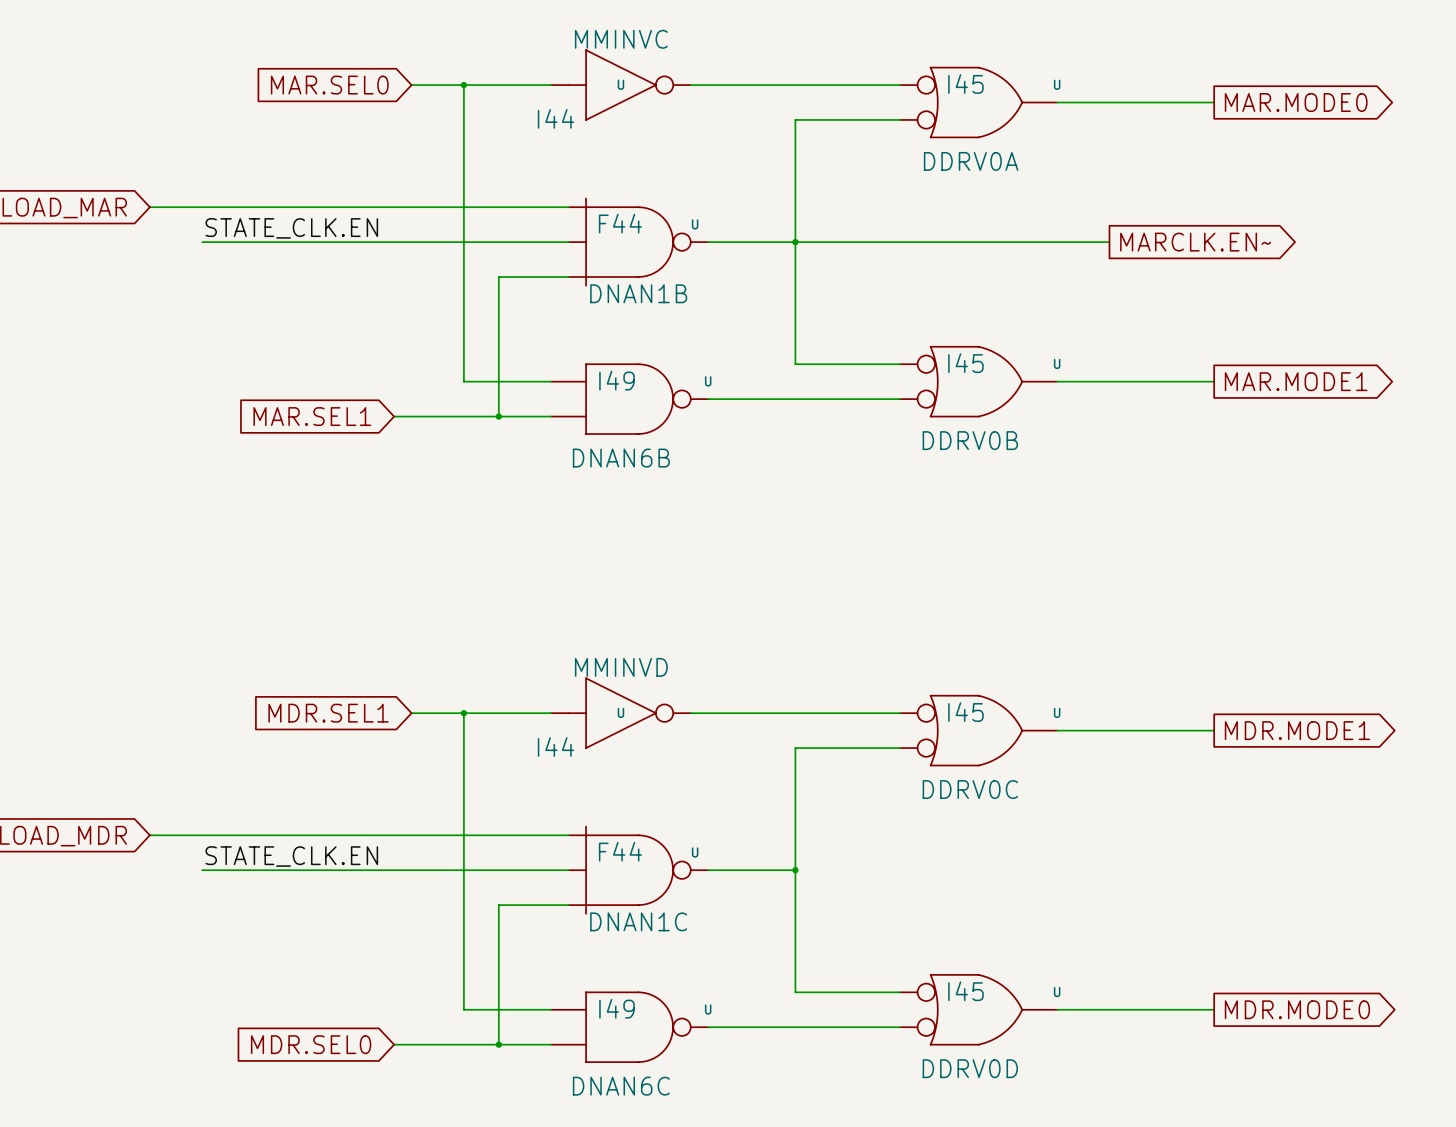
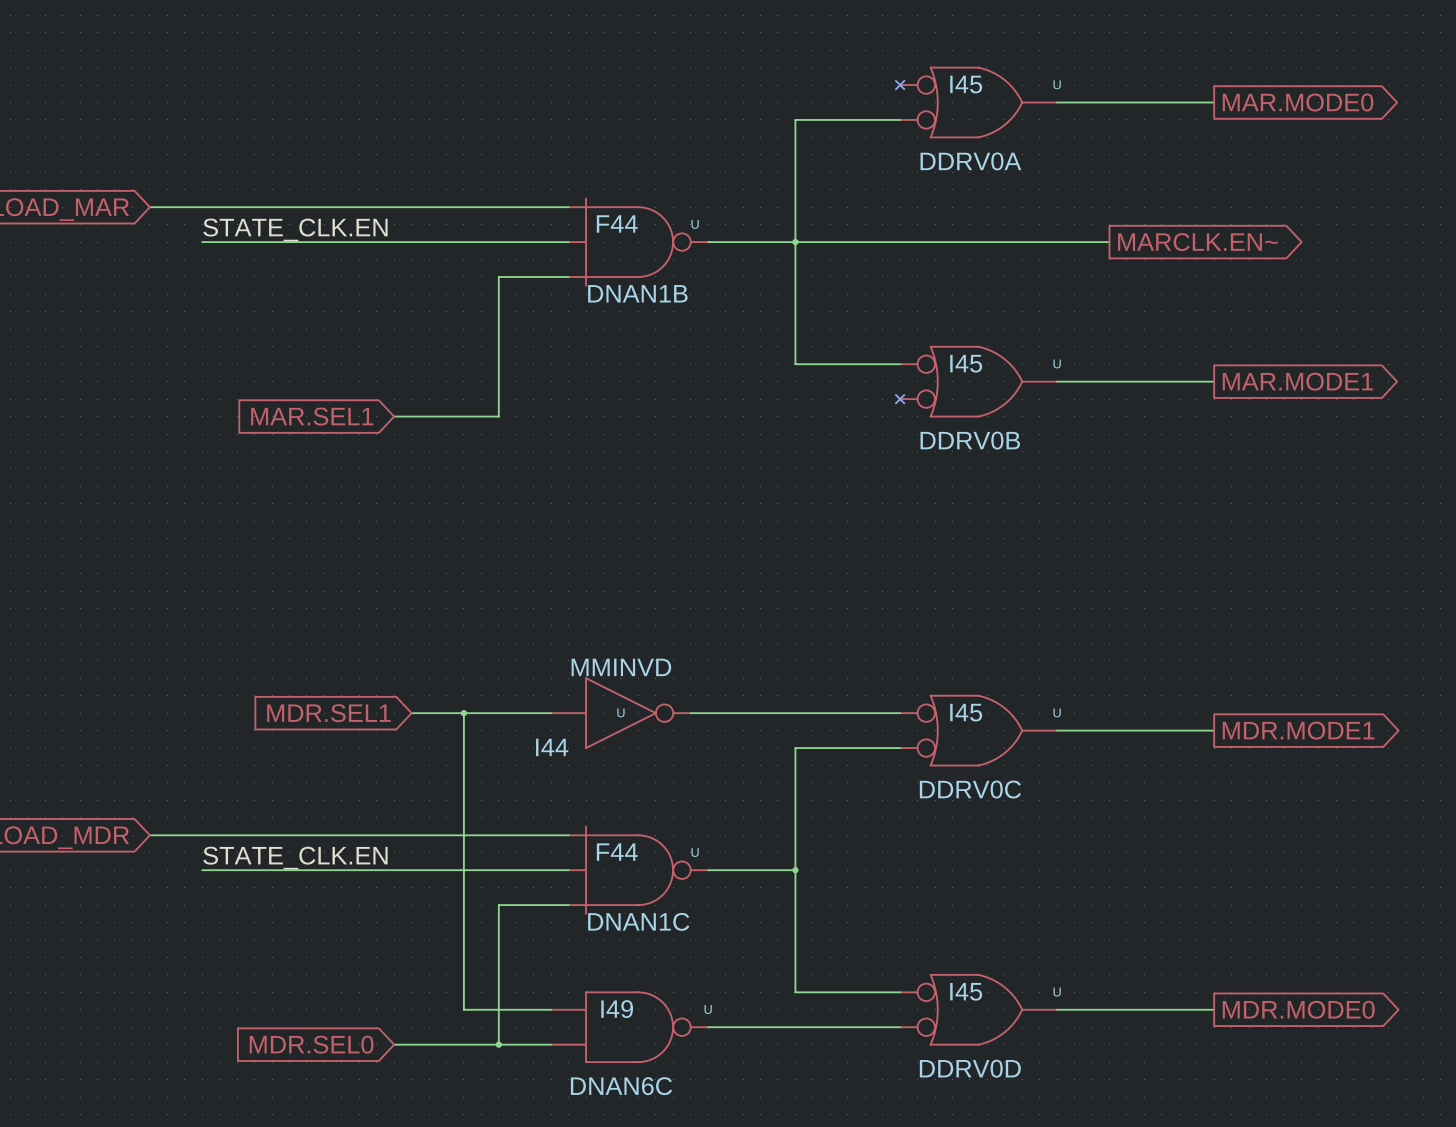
global label: MAR.SEL0 (329, 85) -> none
wire: (411, 85) (551, 85) -> none
wire: (463, 85) (463, 381) (551, 381) -> none
junction: (463, 85) -> none
U: (620, 85) -> none
wire: (690, 85) (900, 85) -> none
no-connect mark: none -> (900, 85)
U: (629, 399) -> none
wire: (708, 399) (900, 399) -> none
no-connect mark: none -> (900, 399)
wire: (498, 416) (551, 416) -> none
junction: (498, 416) -> none

